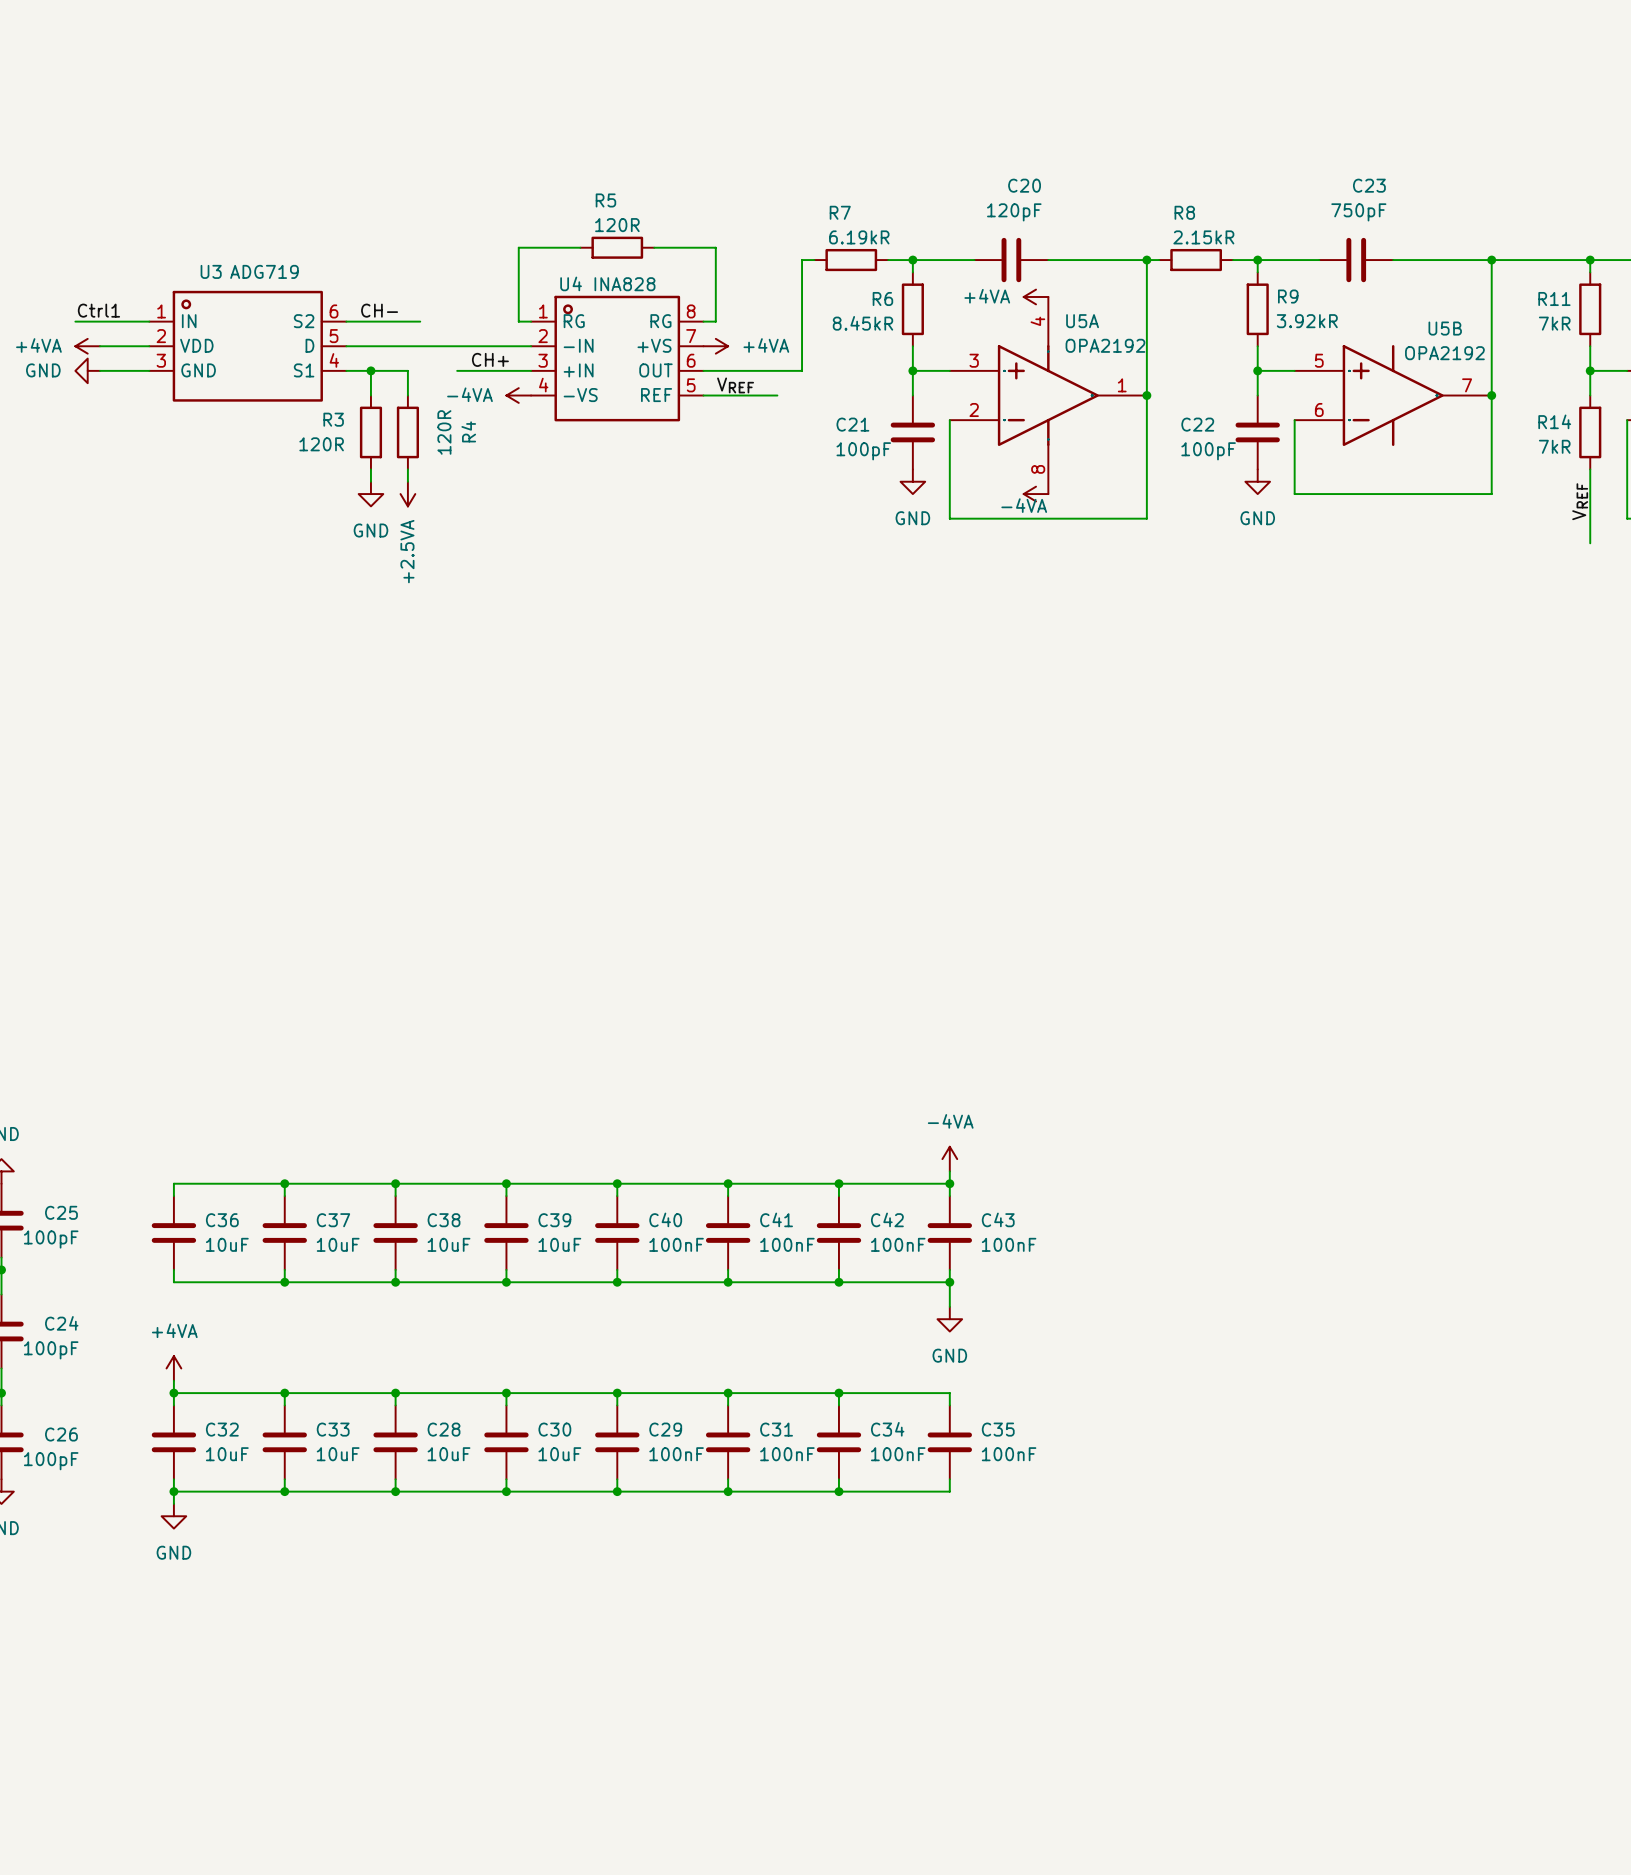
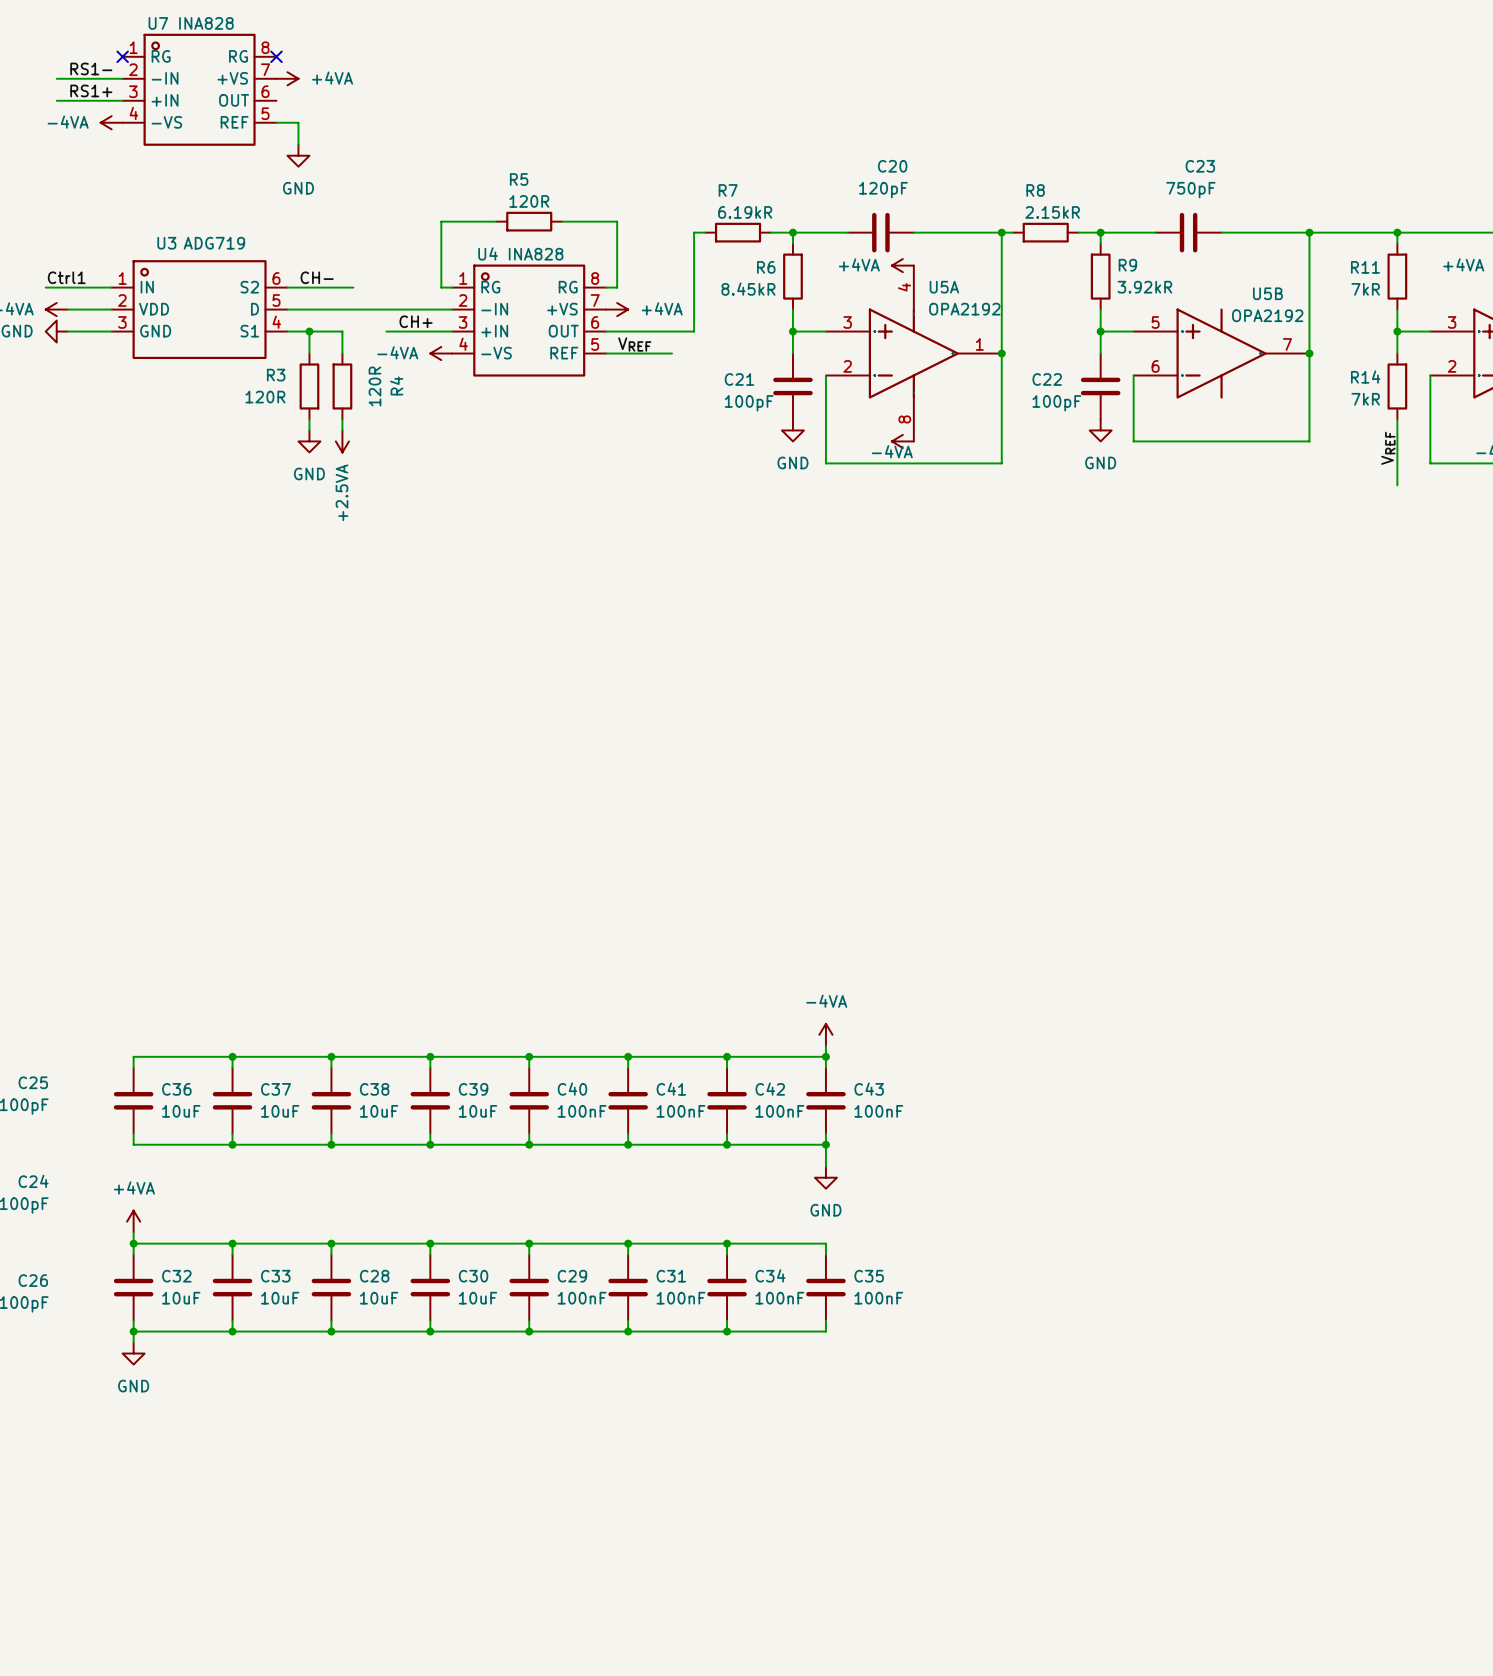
no-connect mark: none -> (122, 56)
no-connect mark: none -> (276, 56)
label: none -> RS1- (91, 68)
wire: none -> (56, 78) (122, 78)
power symbol: none -> +4VA (287, 78)
U7: none -> INA828 (199, 89)
label: none -> RS1+ (91, 90)
wire: none -> (56, 100) (122, 100)
power symbol: none -> -4VA (111, 122)
wire: none -> (276, 122) (298, 122) (298, 144)
power symbol: none -> GND (298, 155)

